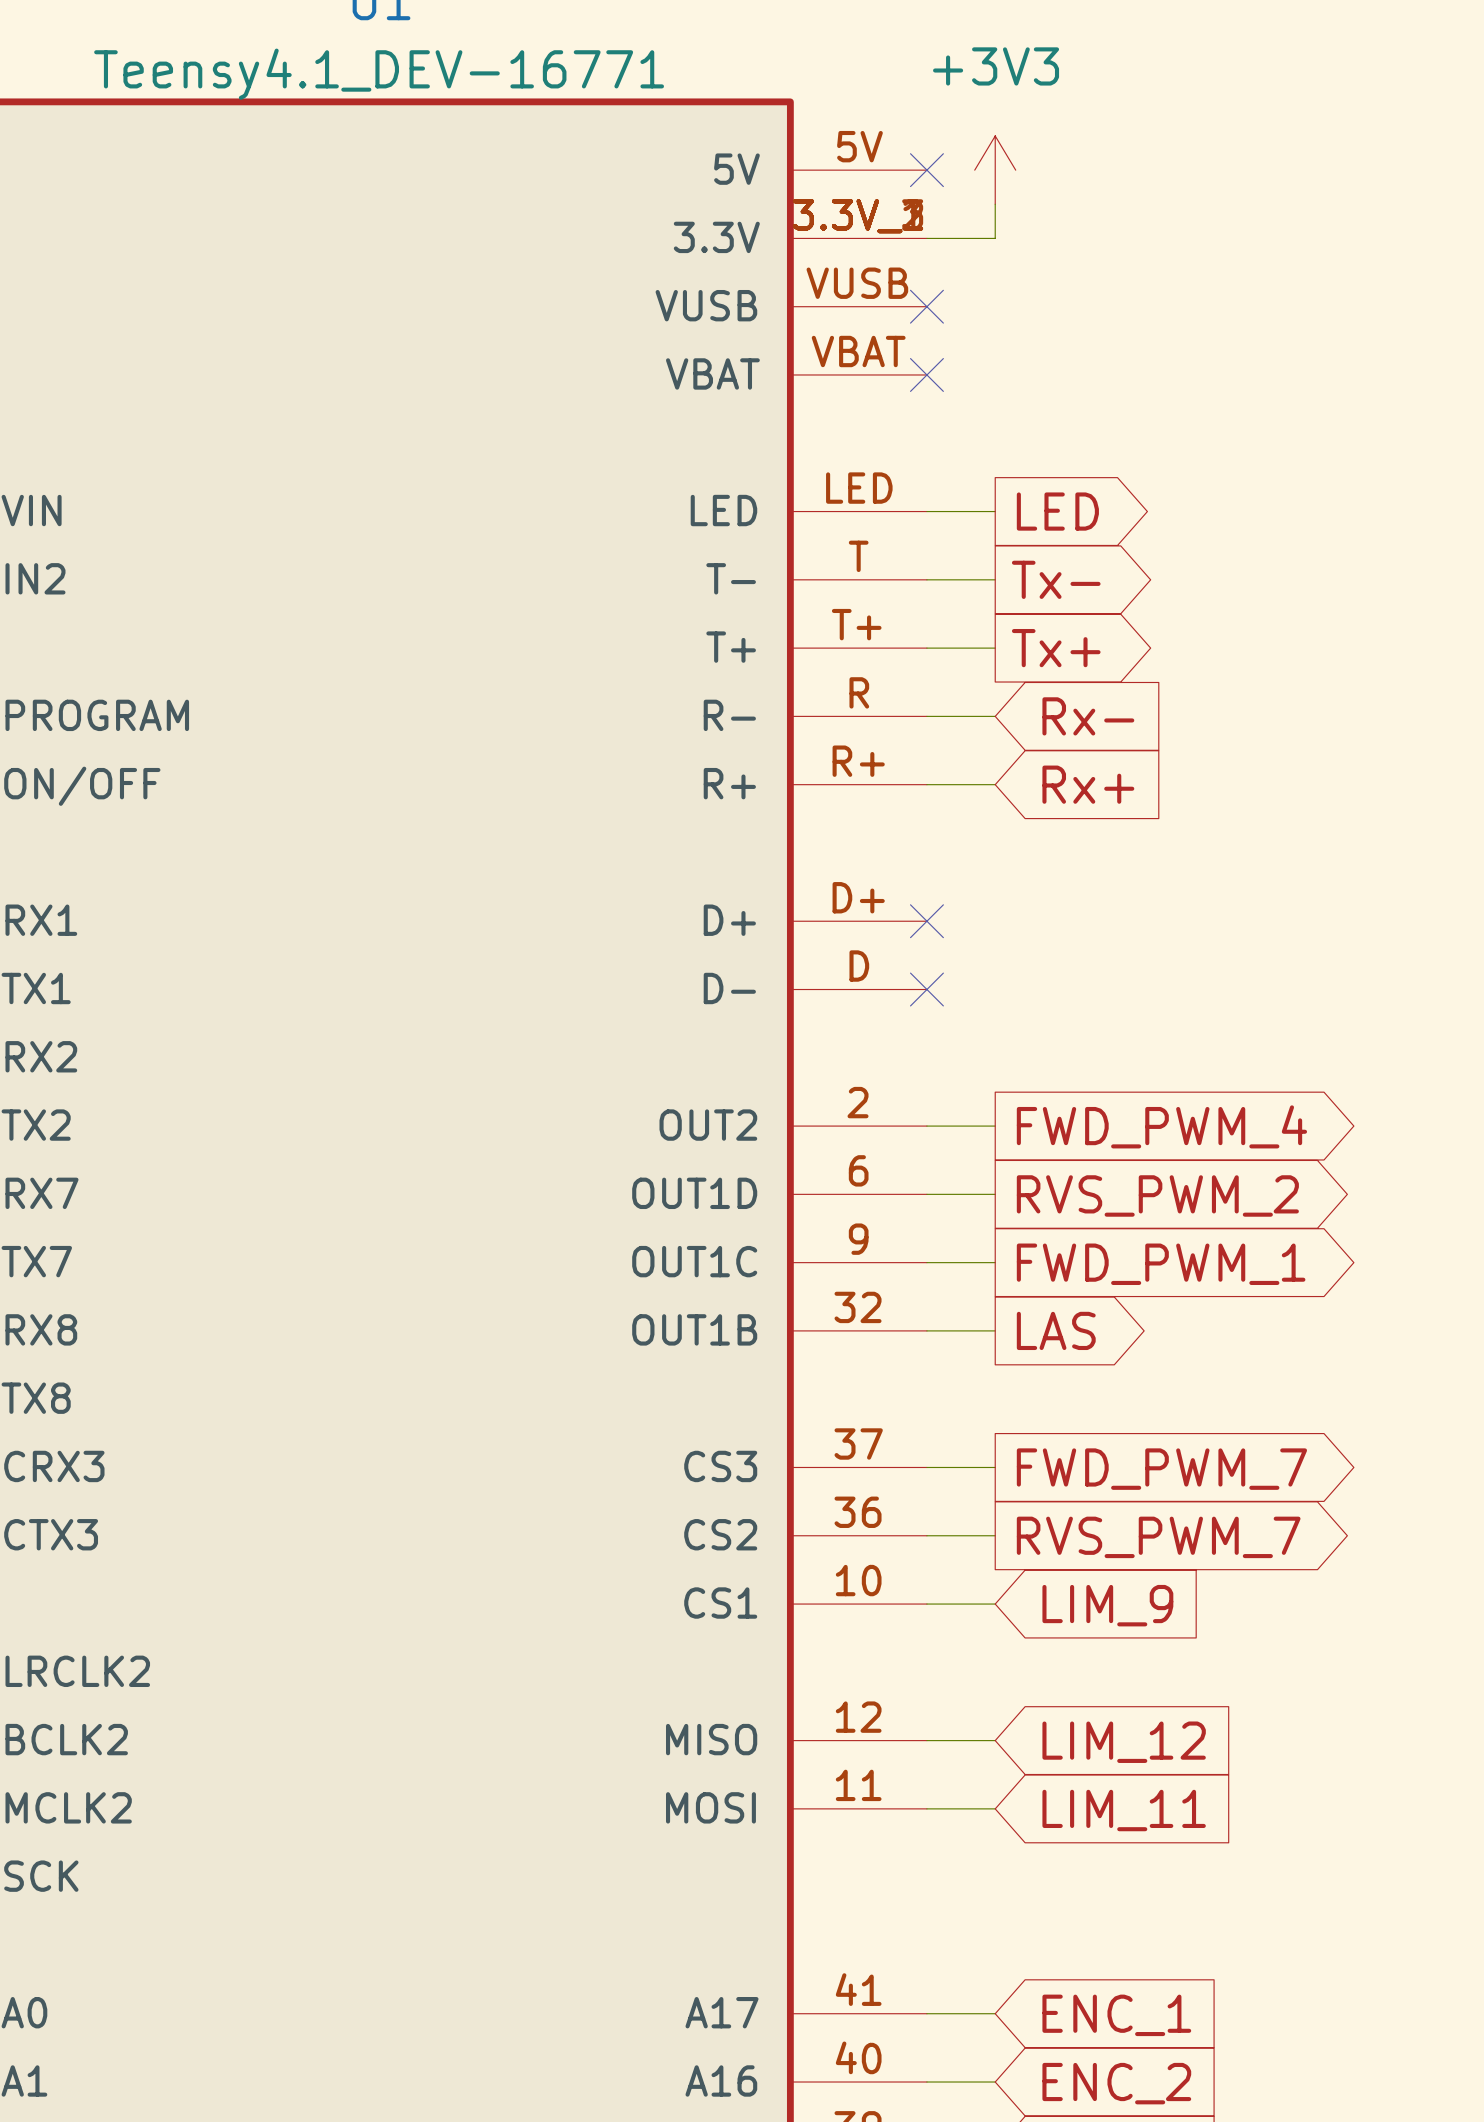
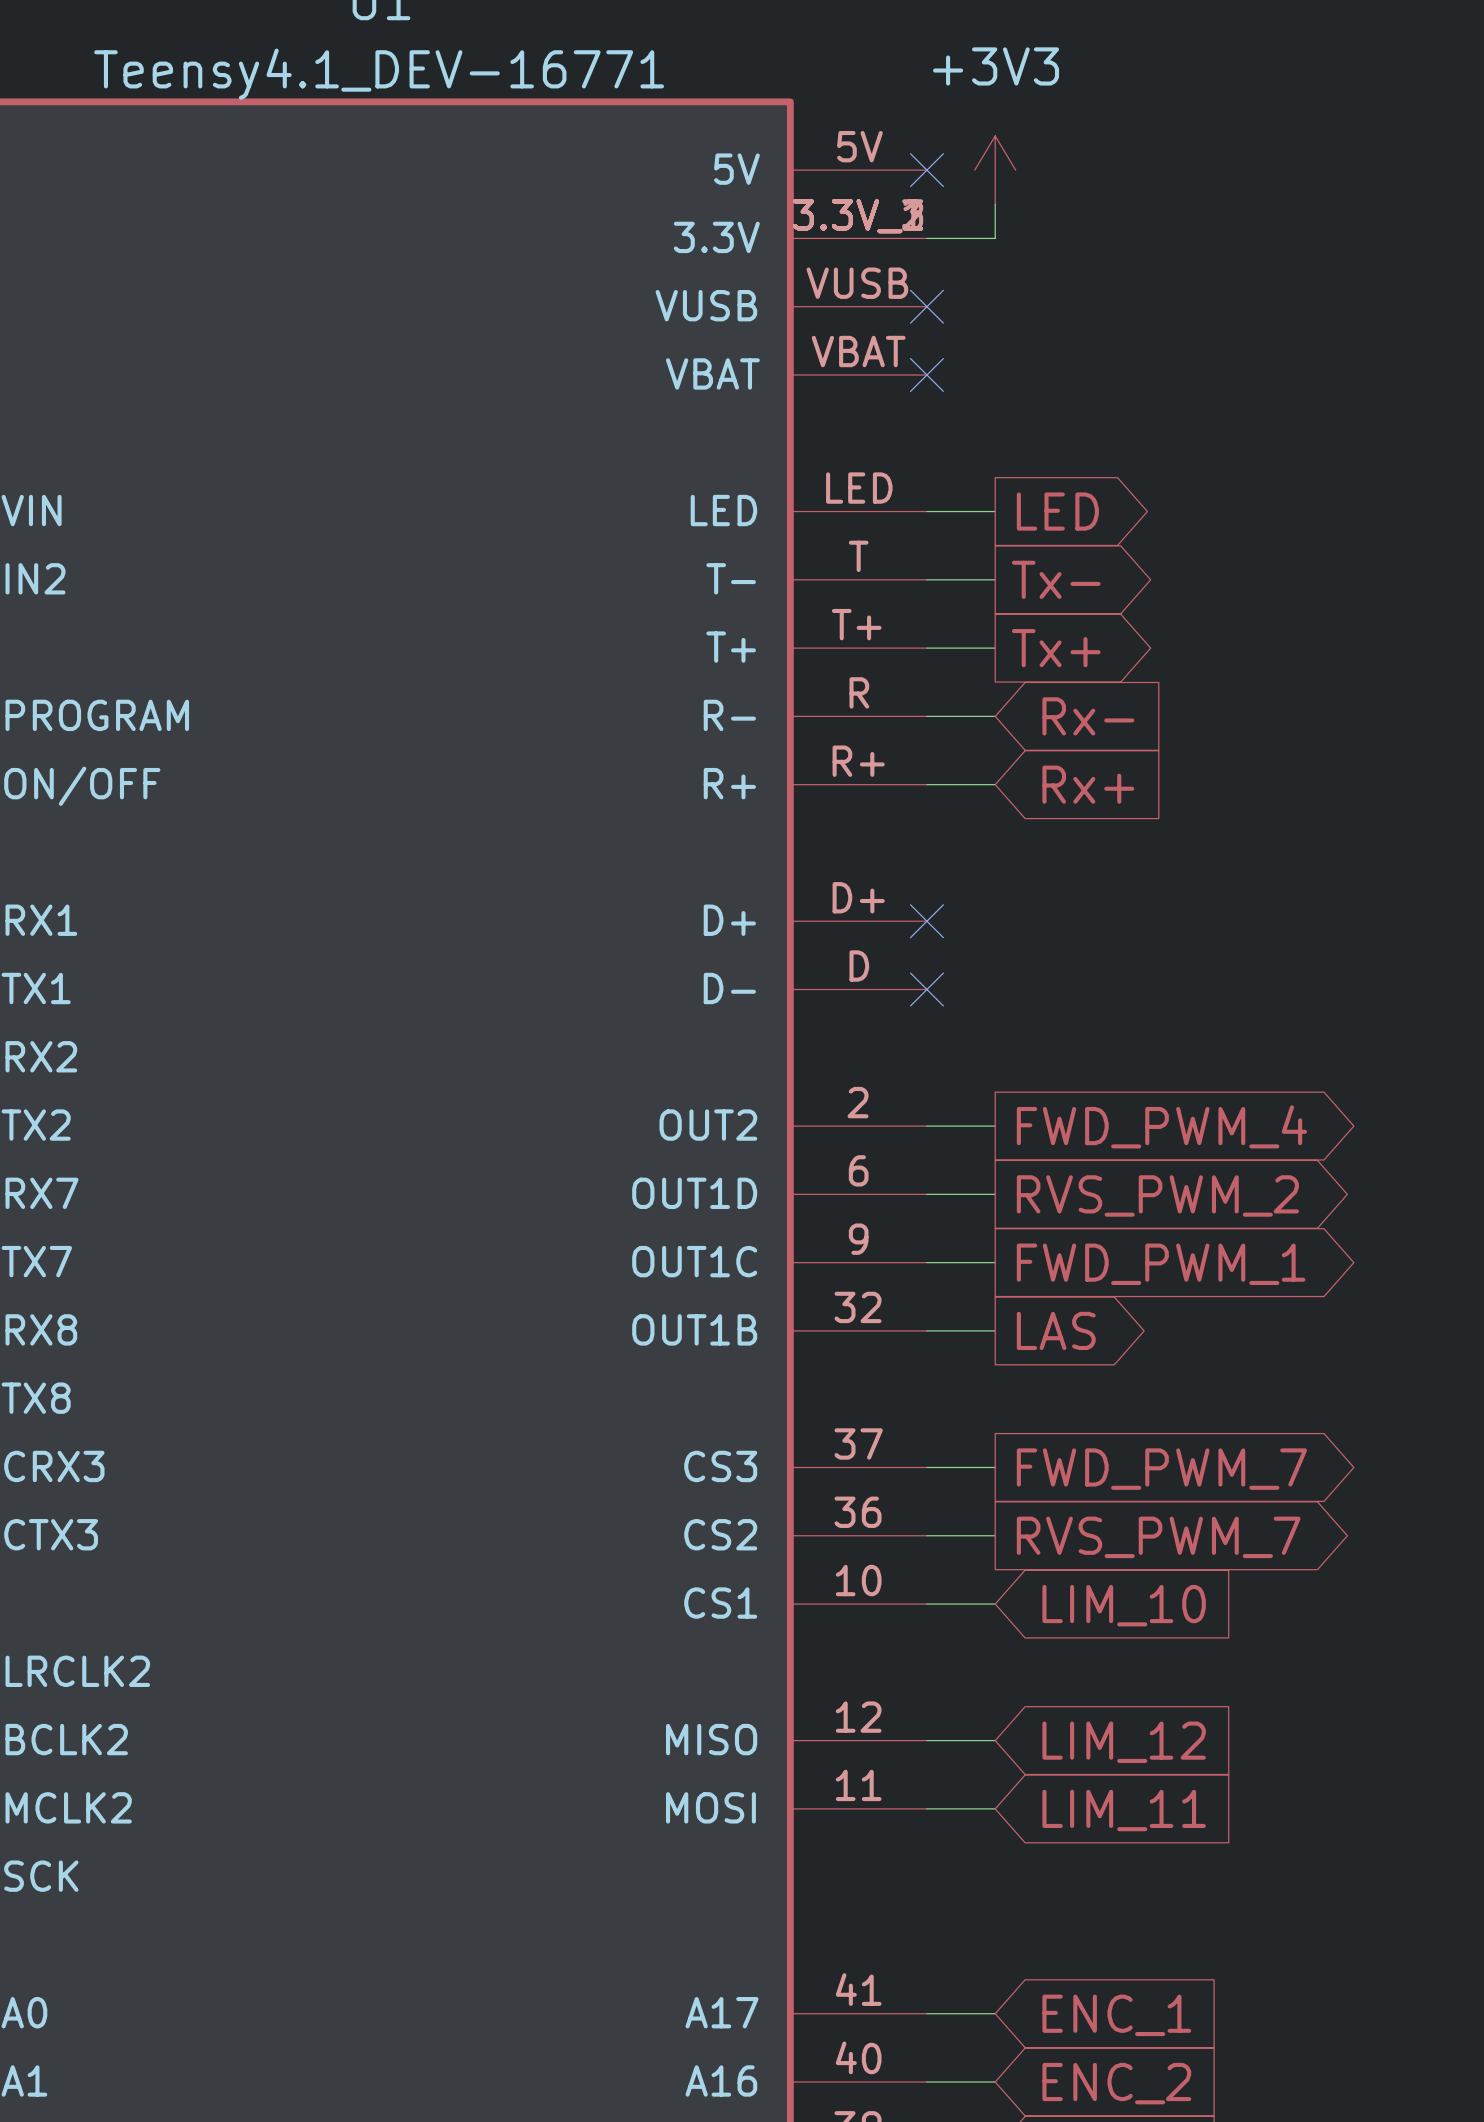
global label: LIM_9 (1107, 1605) -> LIM_10 (1124, 1605)

